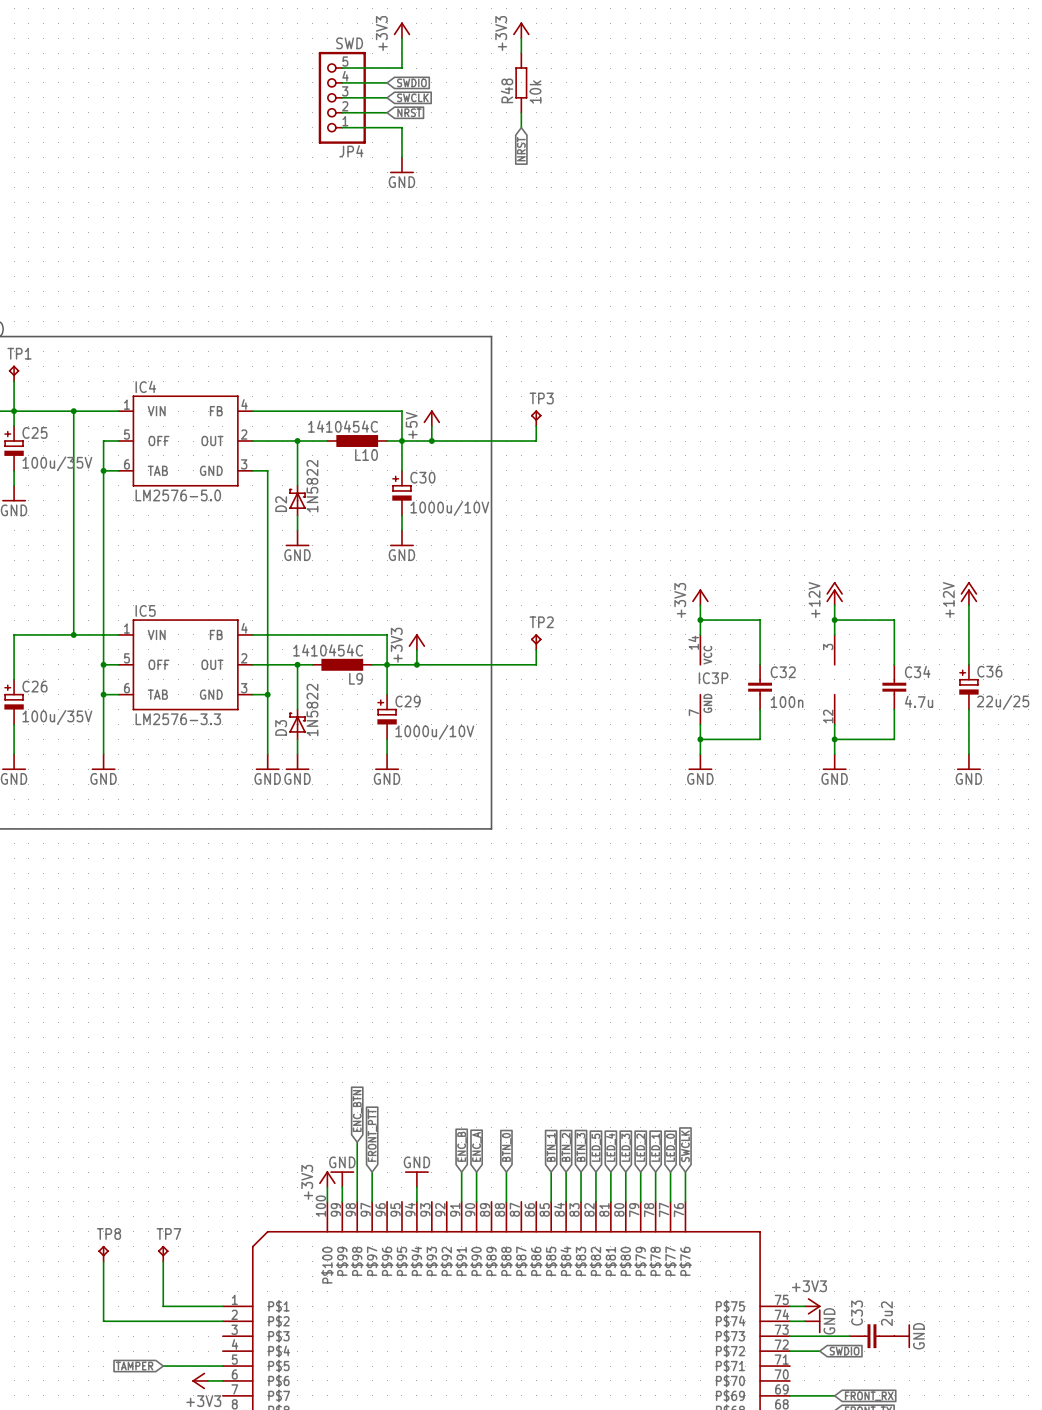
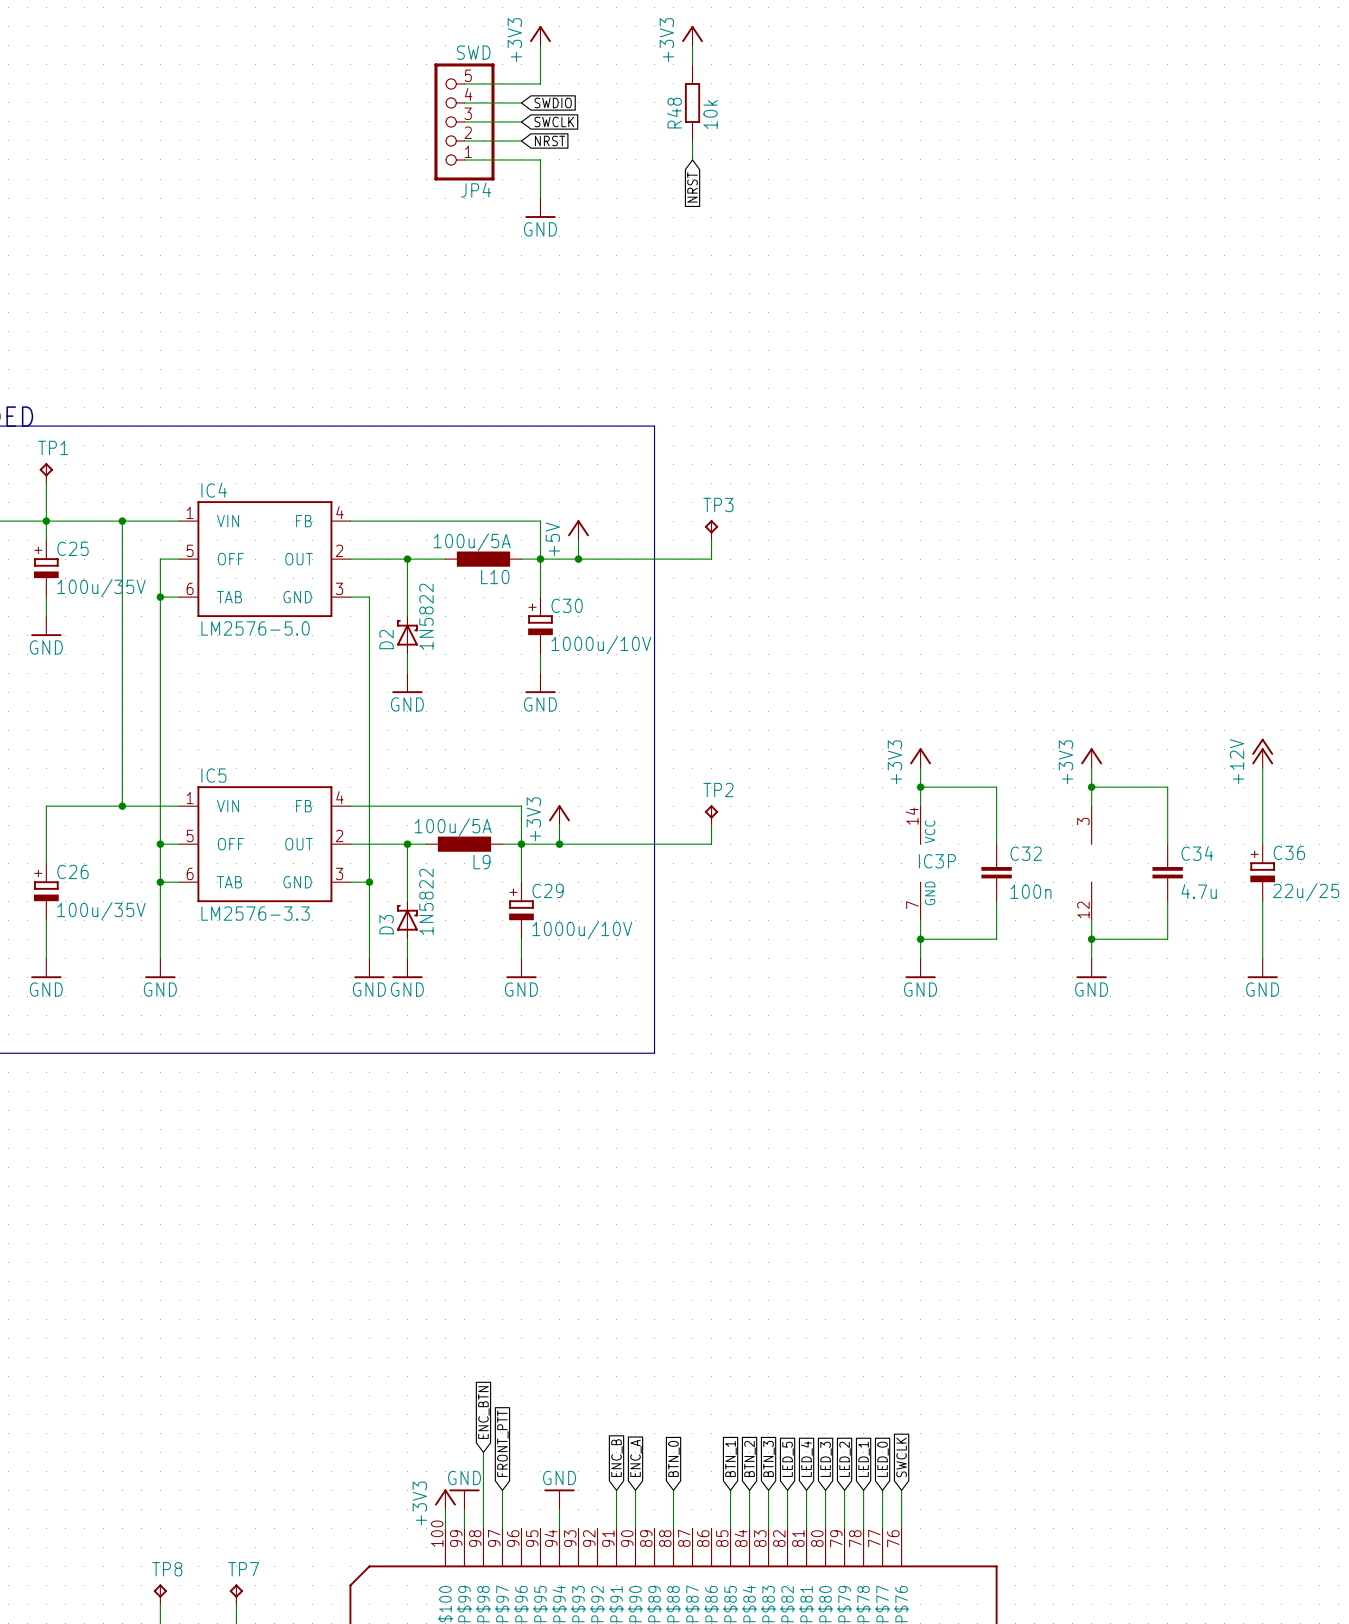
L10 value: 1410454C (343, 426) -> 100u/5A (472, 542)
power symbol: +12V (834, 593) -> +3V3 (1091, 758)
L9 value: 1410454C (328, 650) -> 100u/5A (453, 827)

